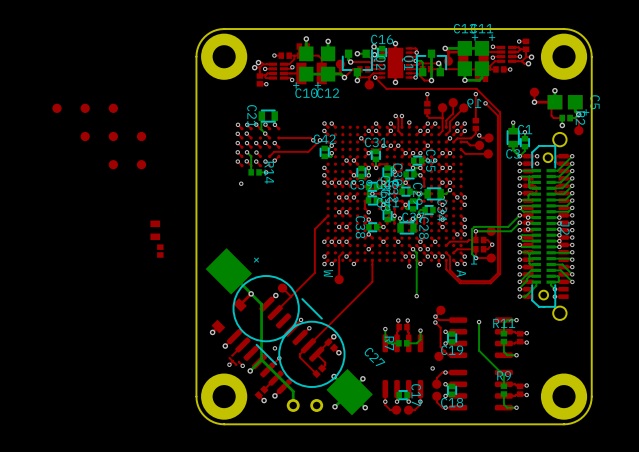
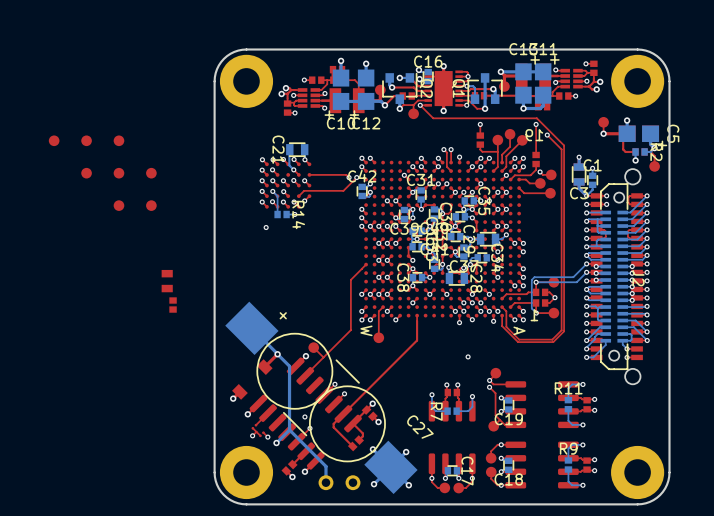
bottom track: (413, 249) (416, 252) (416, 296) -> none
bottom track: (479, 322) (479, 350) (503, 375) -> (582, 444) (572, 444) (568, 448)
via: (479, 322) -> none
via: (432, 368) -> none
via: none -> (582, 444)

